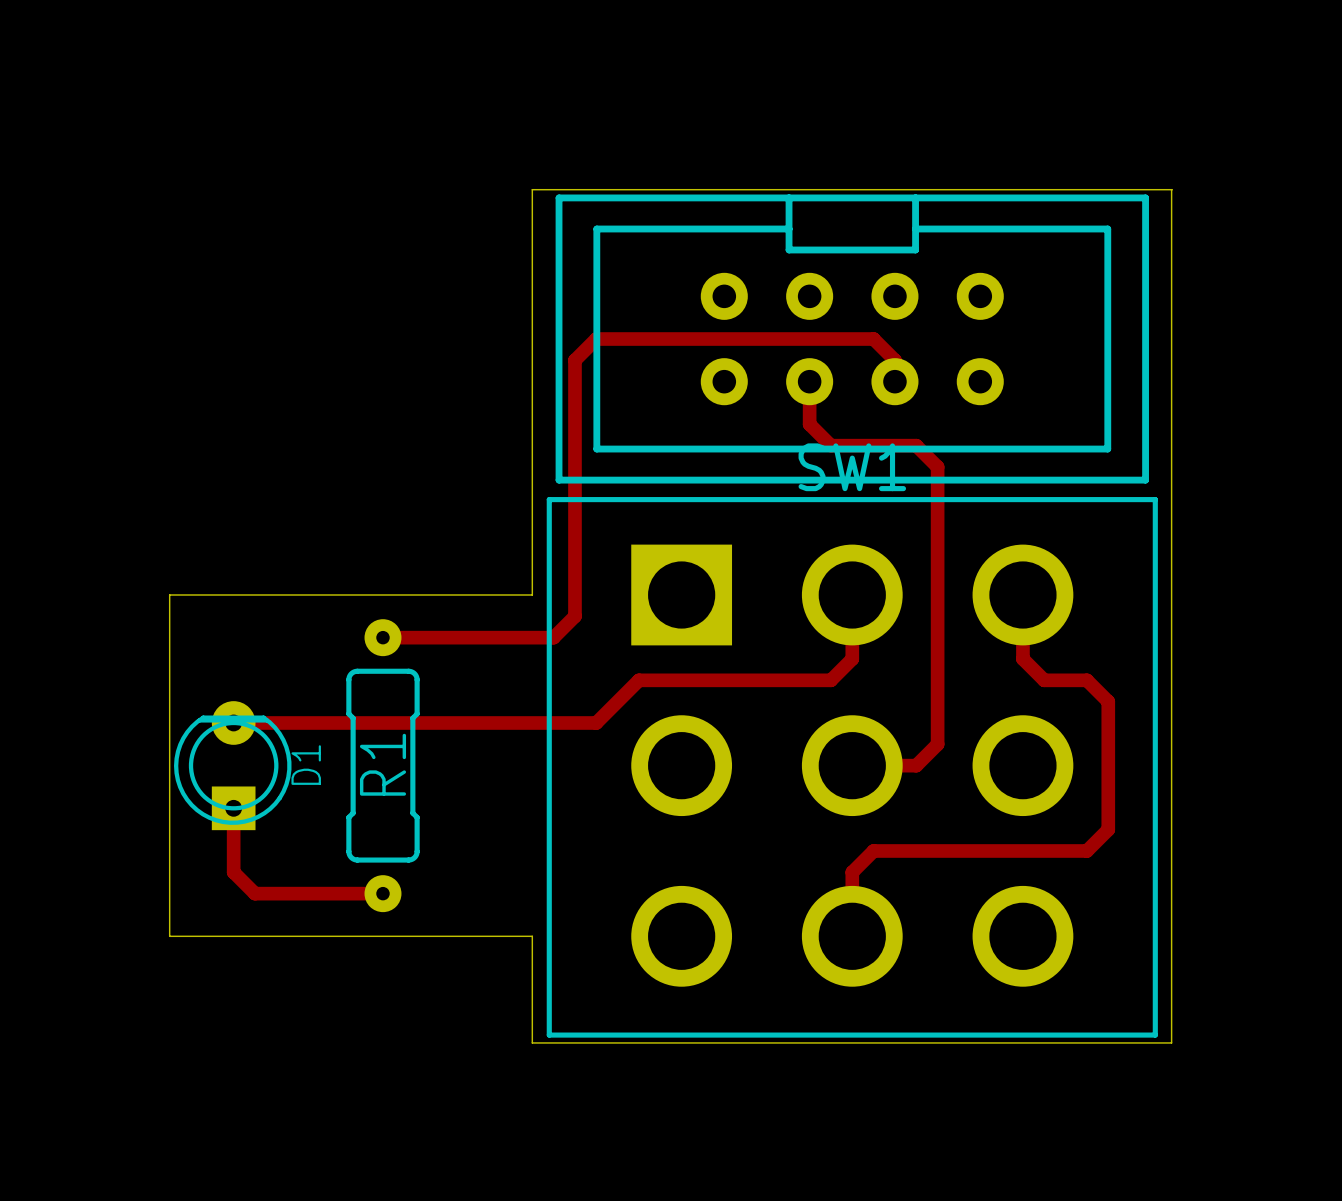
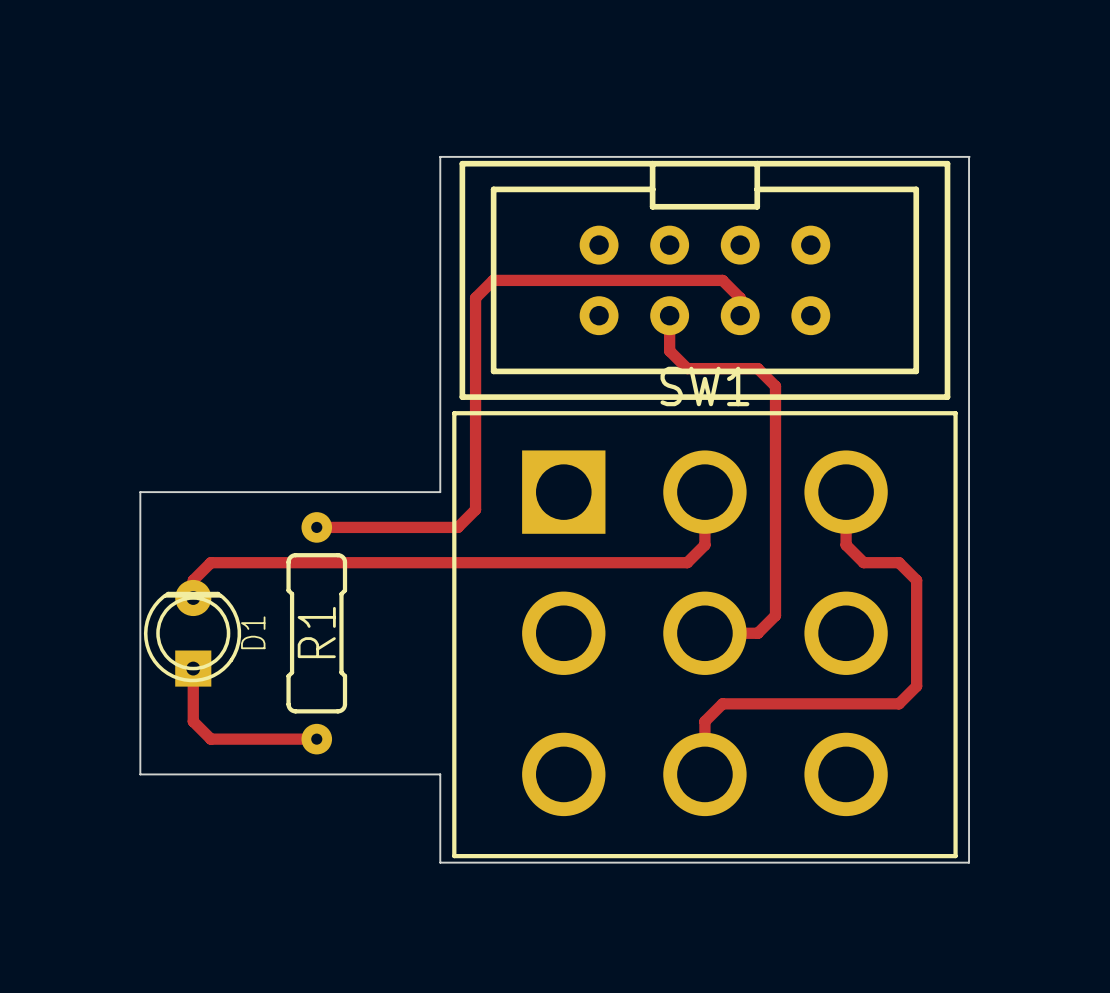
track: (638, 680) (596, 722) (233, 722) -> (528, 562) (210, 562) (193, 580) (193, 597)

